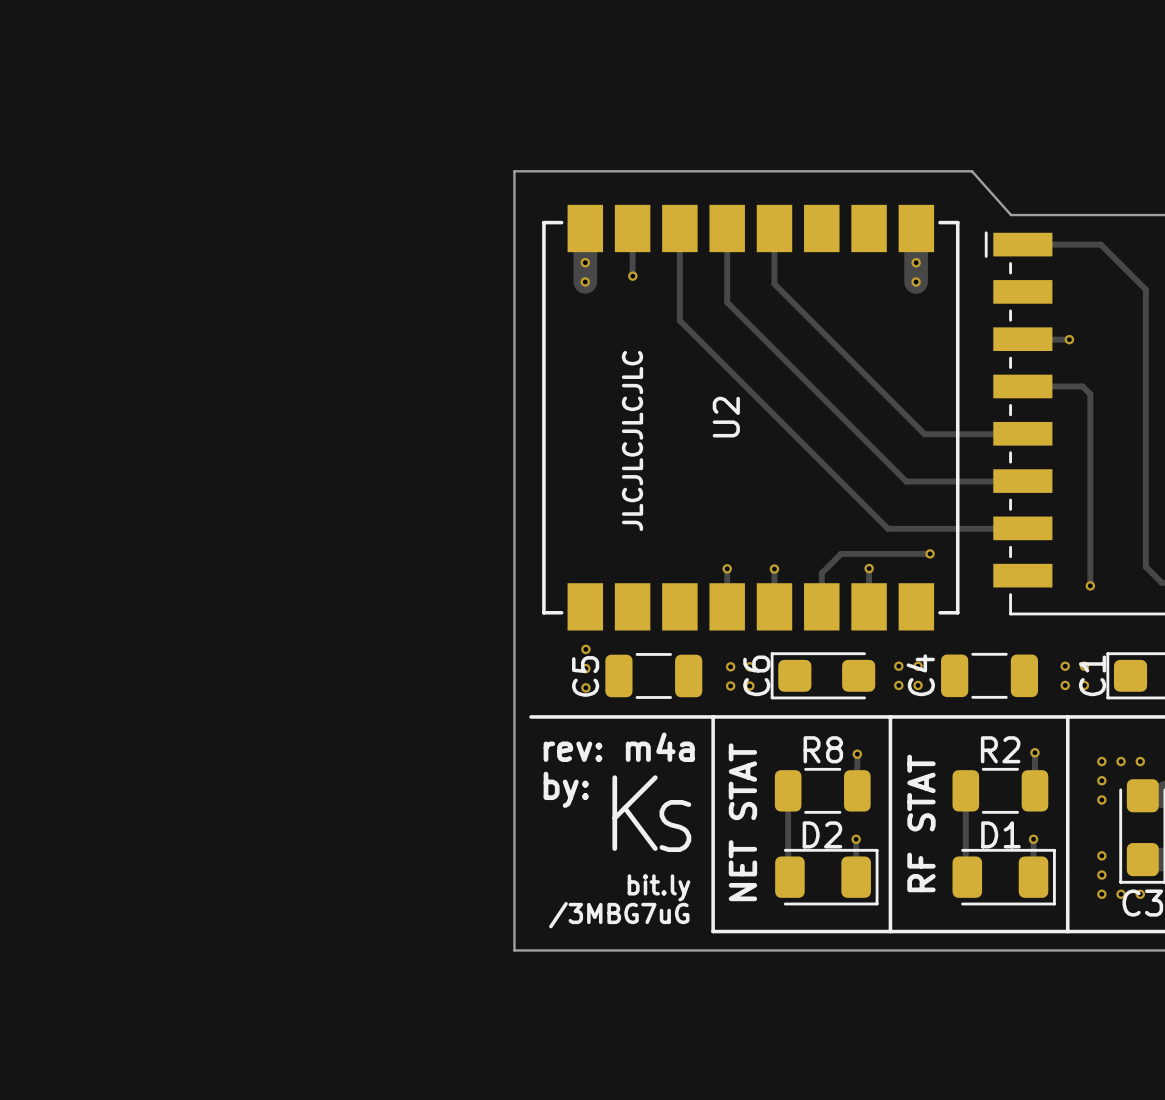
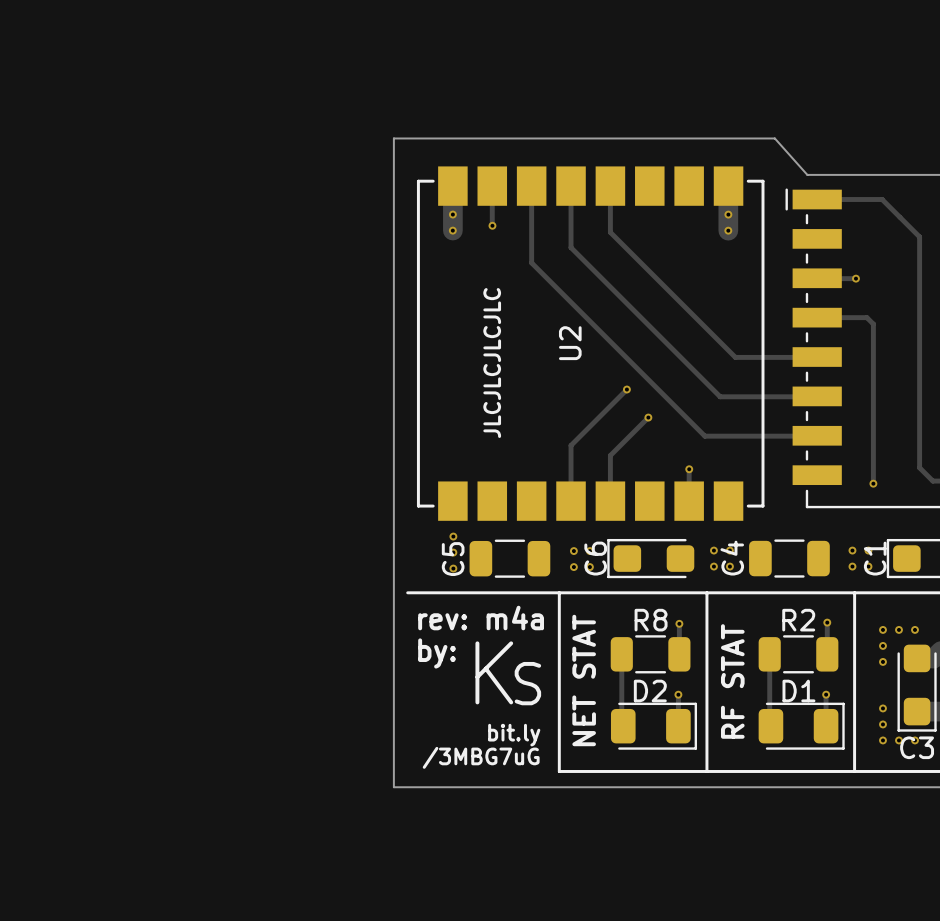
track: none -> (626, 389) (571, 445) (571, 469)
via: none -> (626, 389)
track: none -> (648, 417) (610, 455) (610, 469)
via: none -> (648, 417)
track: (930, 553) (841, 553) (821, 573) (821, 606) -> none
via: (930, 553) -> none
via: (727, 568) -> none
via: (774, 569) -> none

